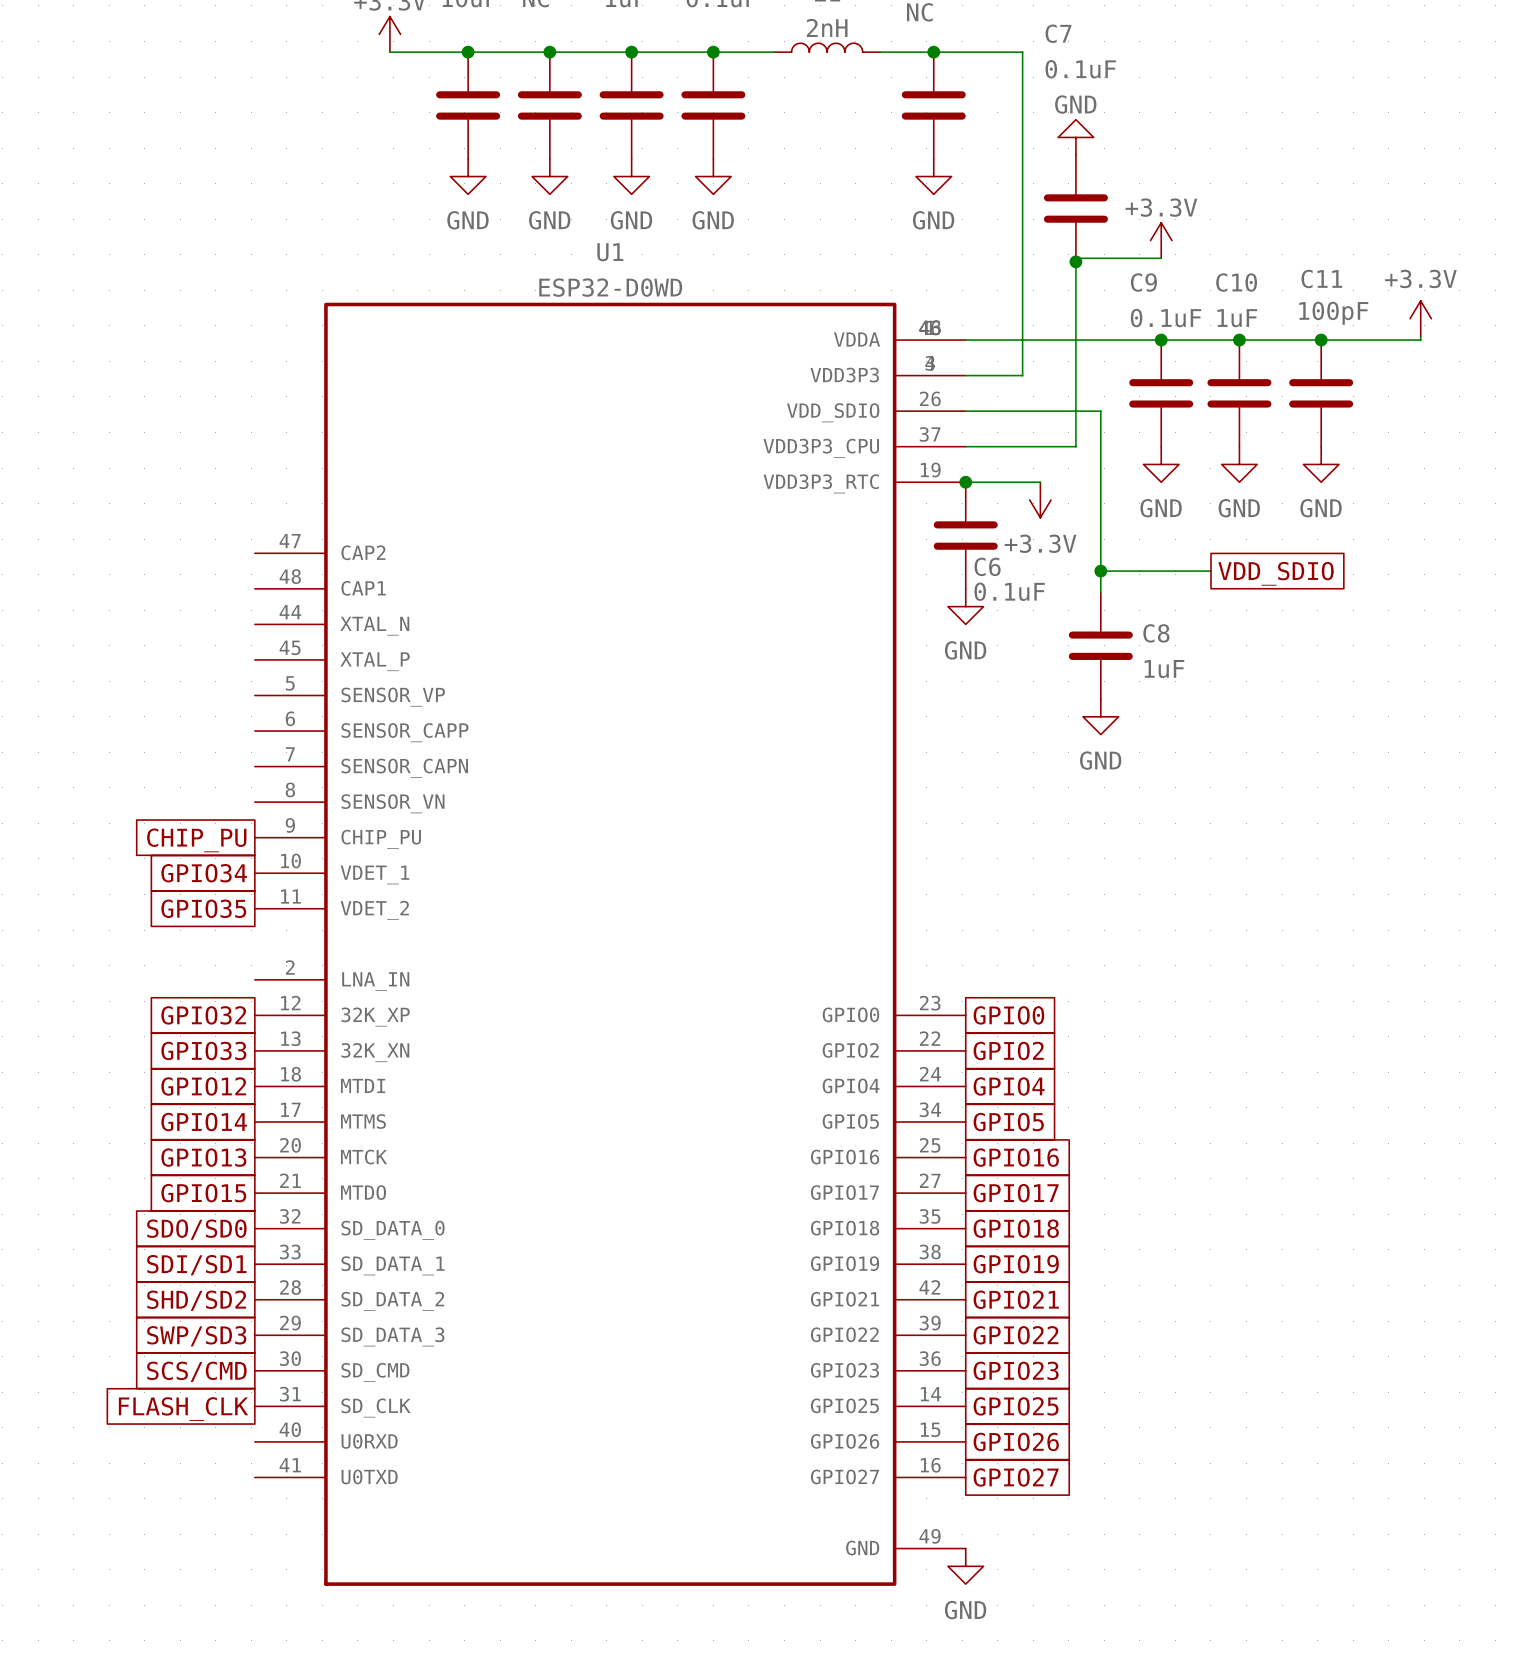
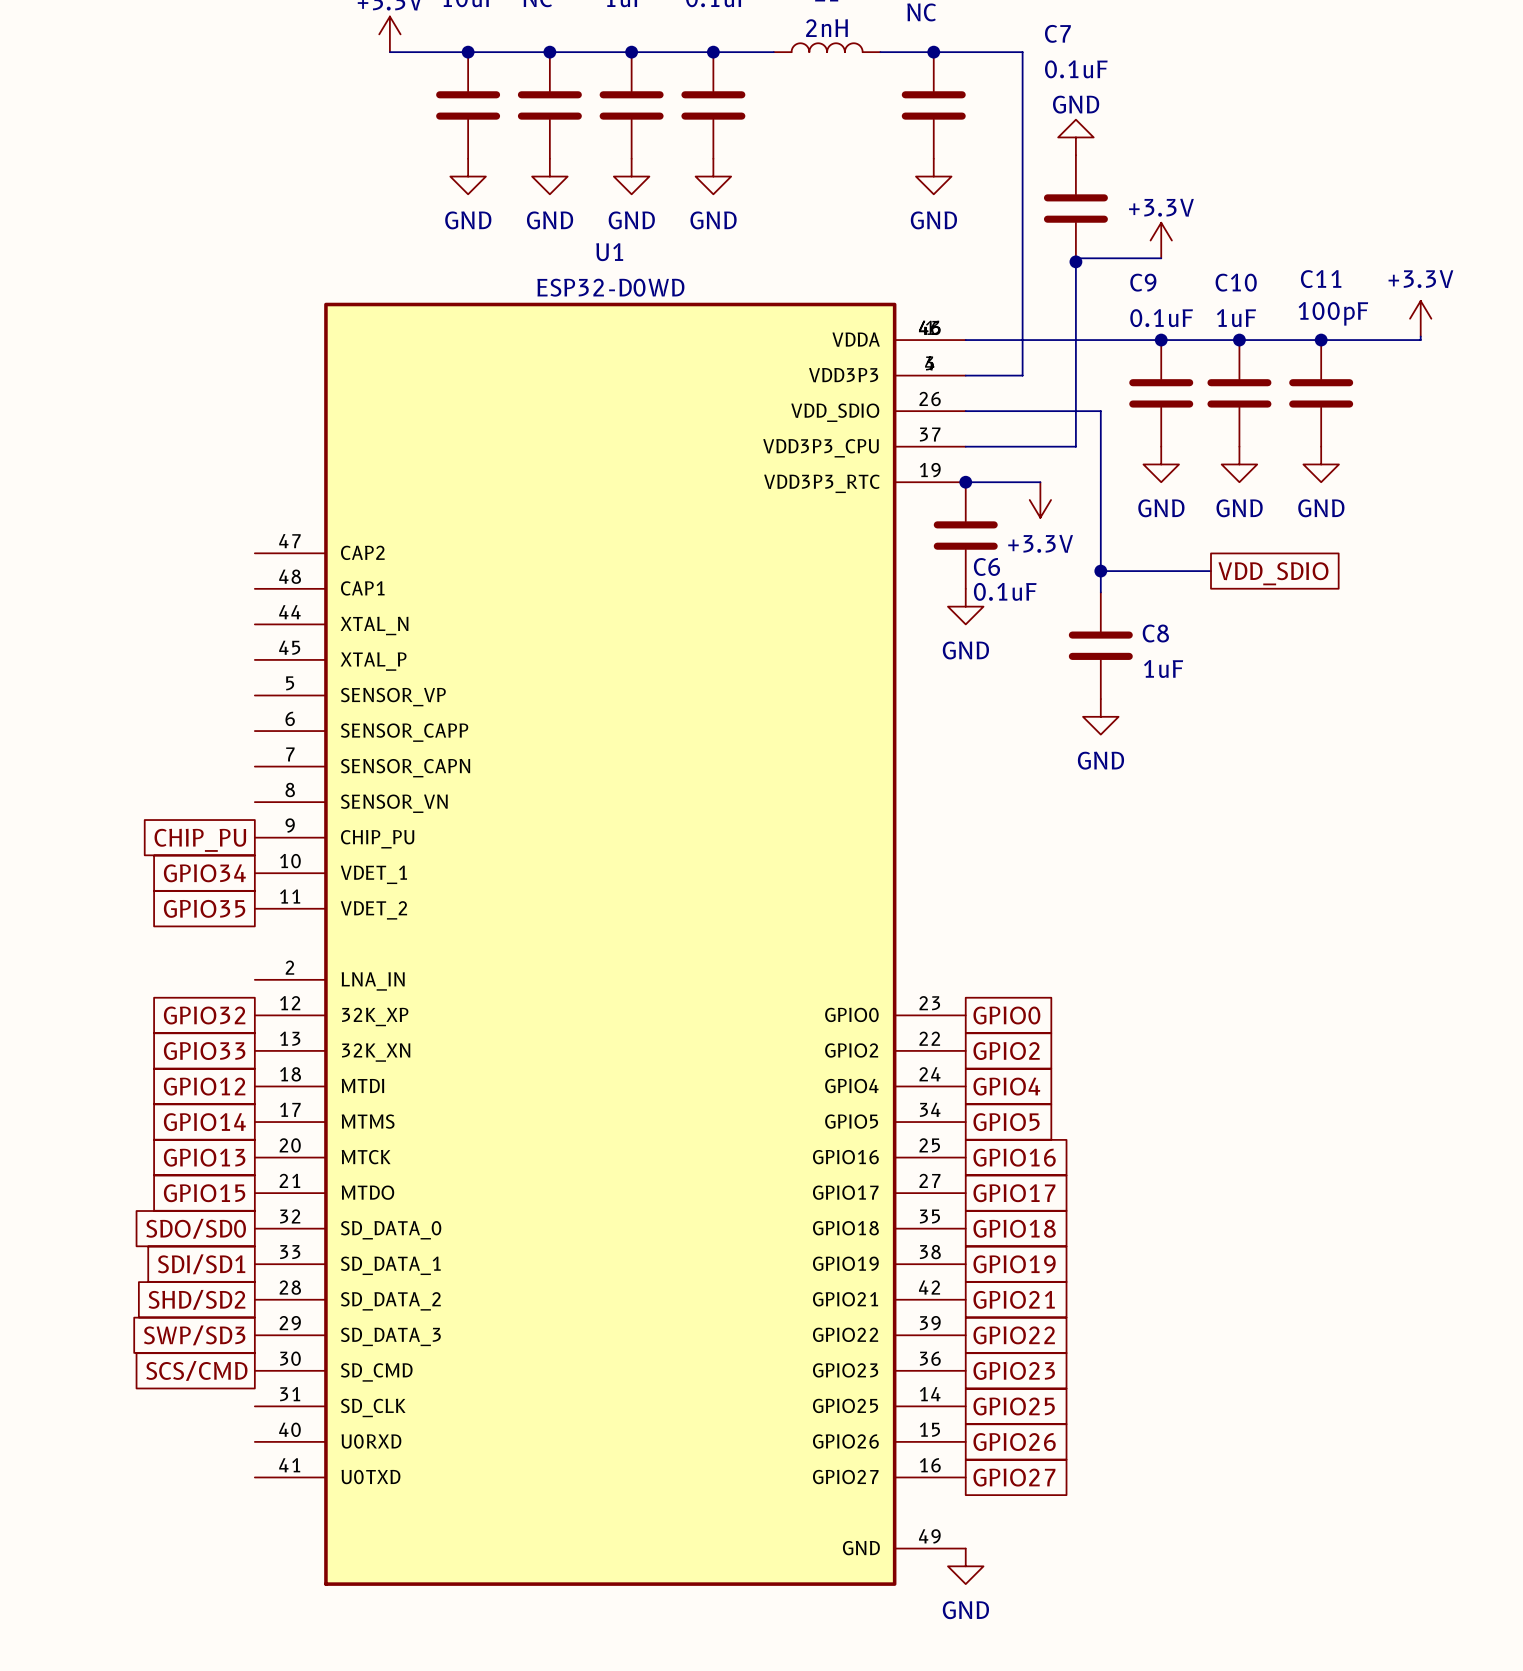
global label: FLASH_CLK (183, 1409) -> none

